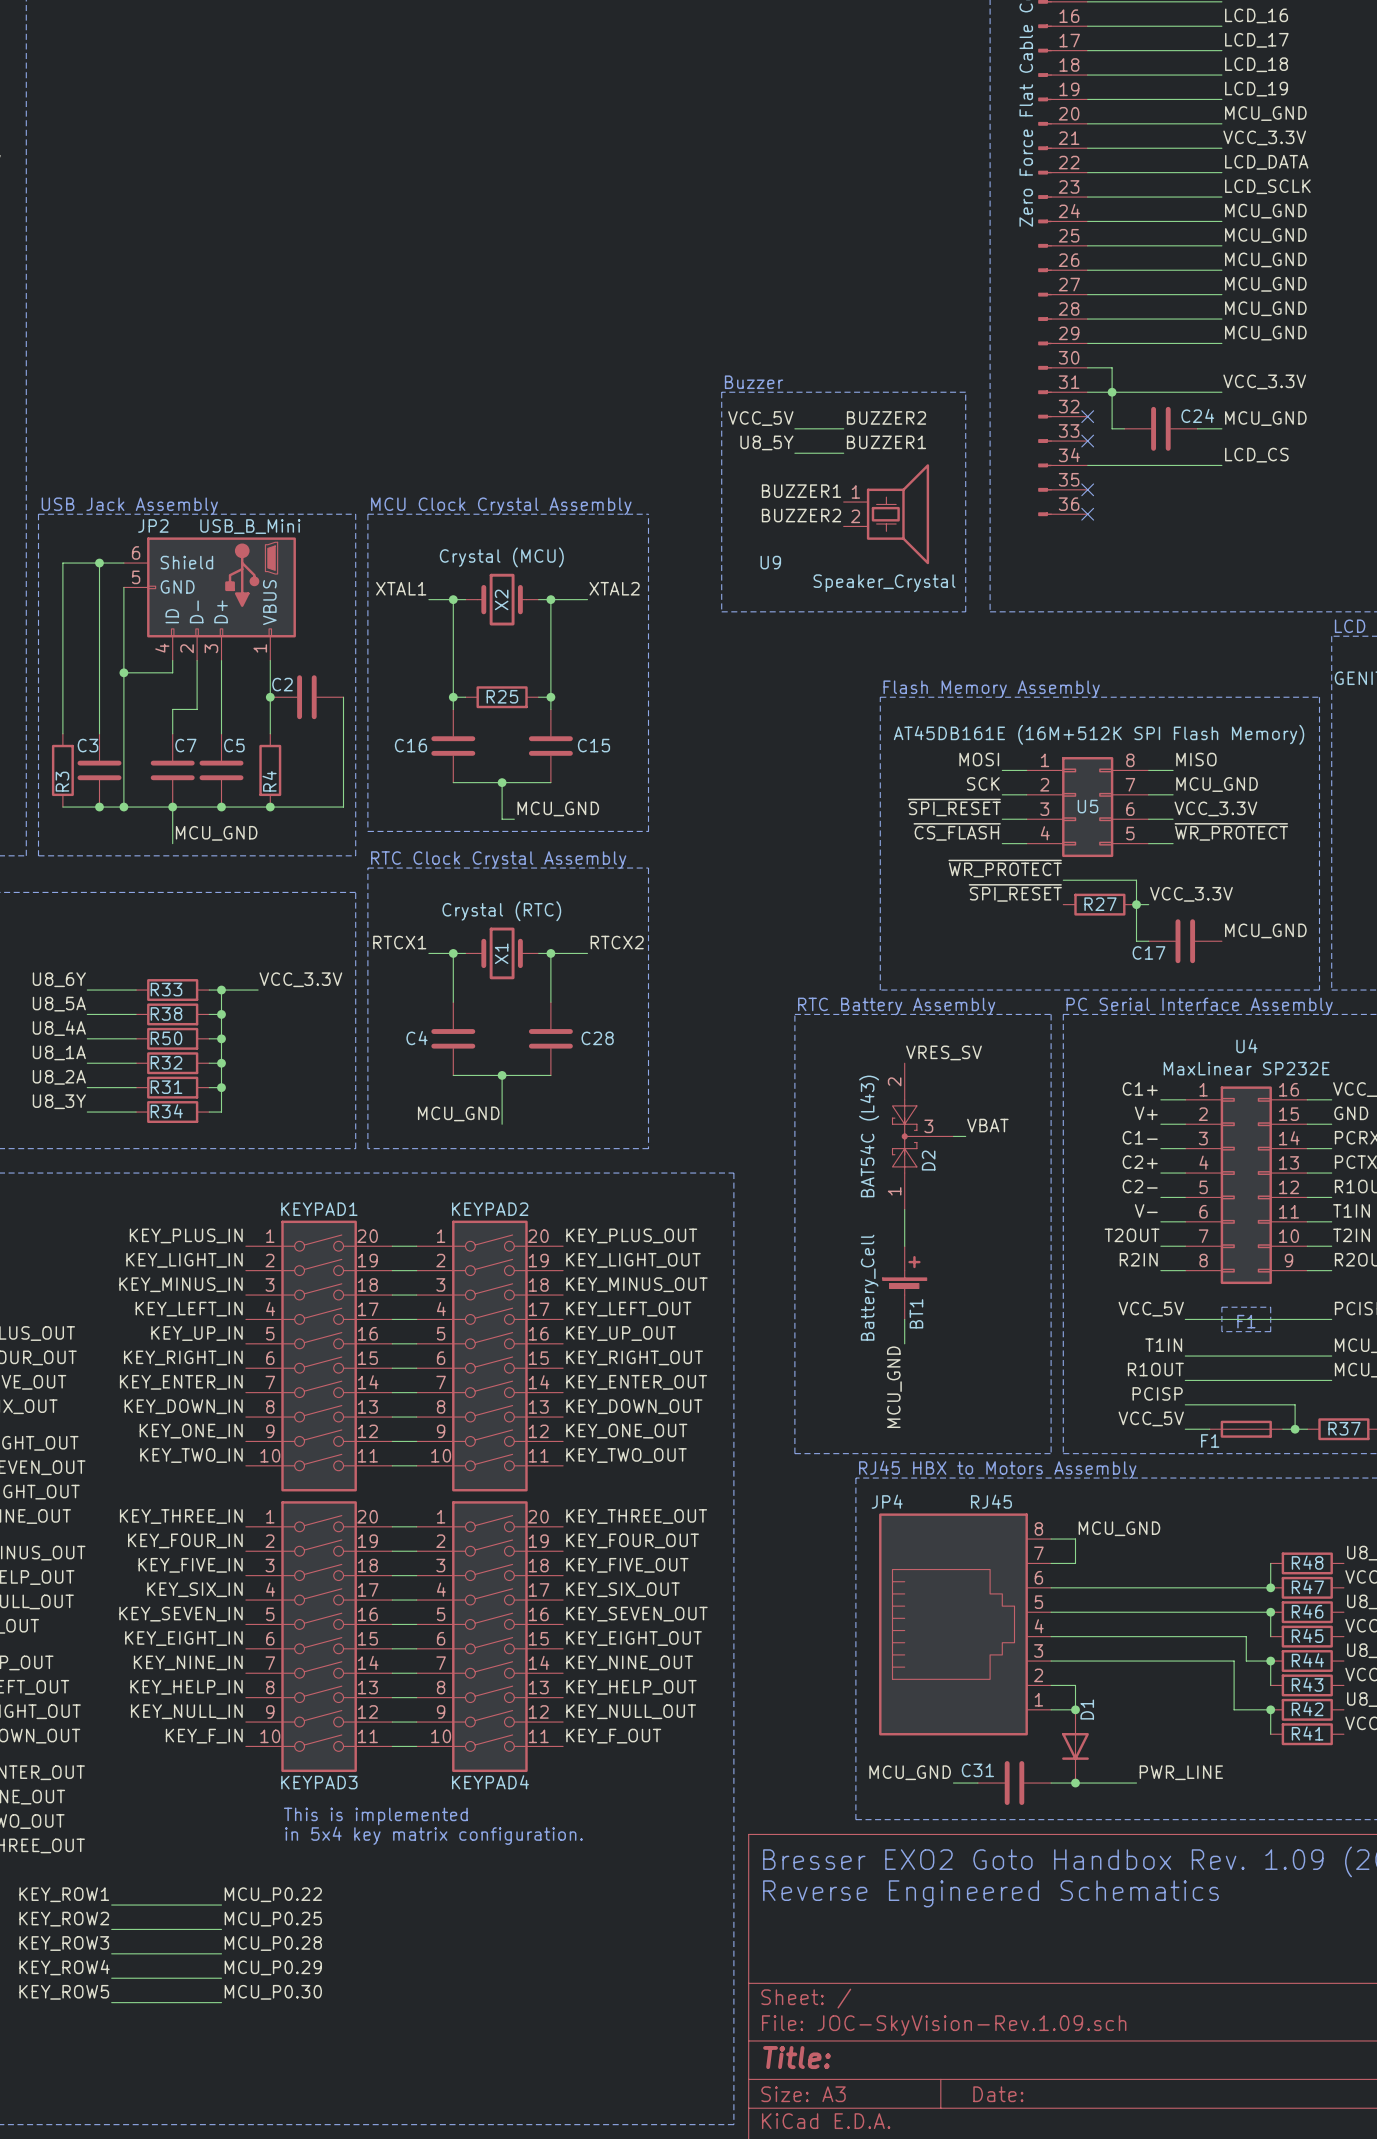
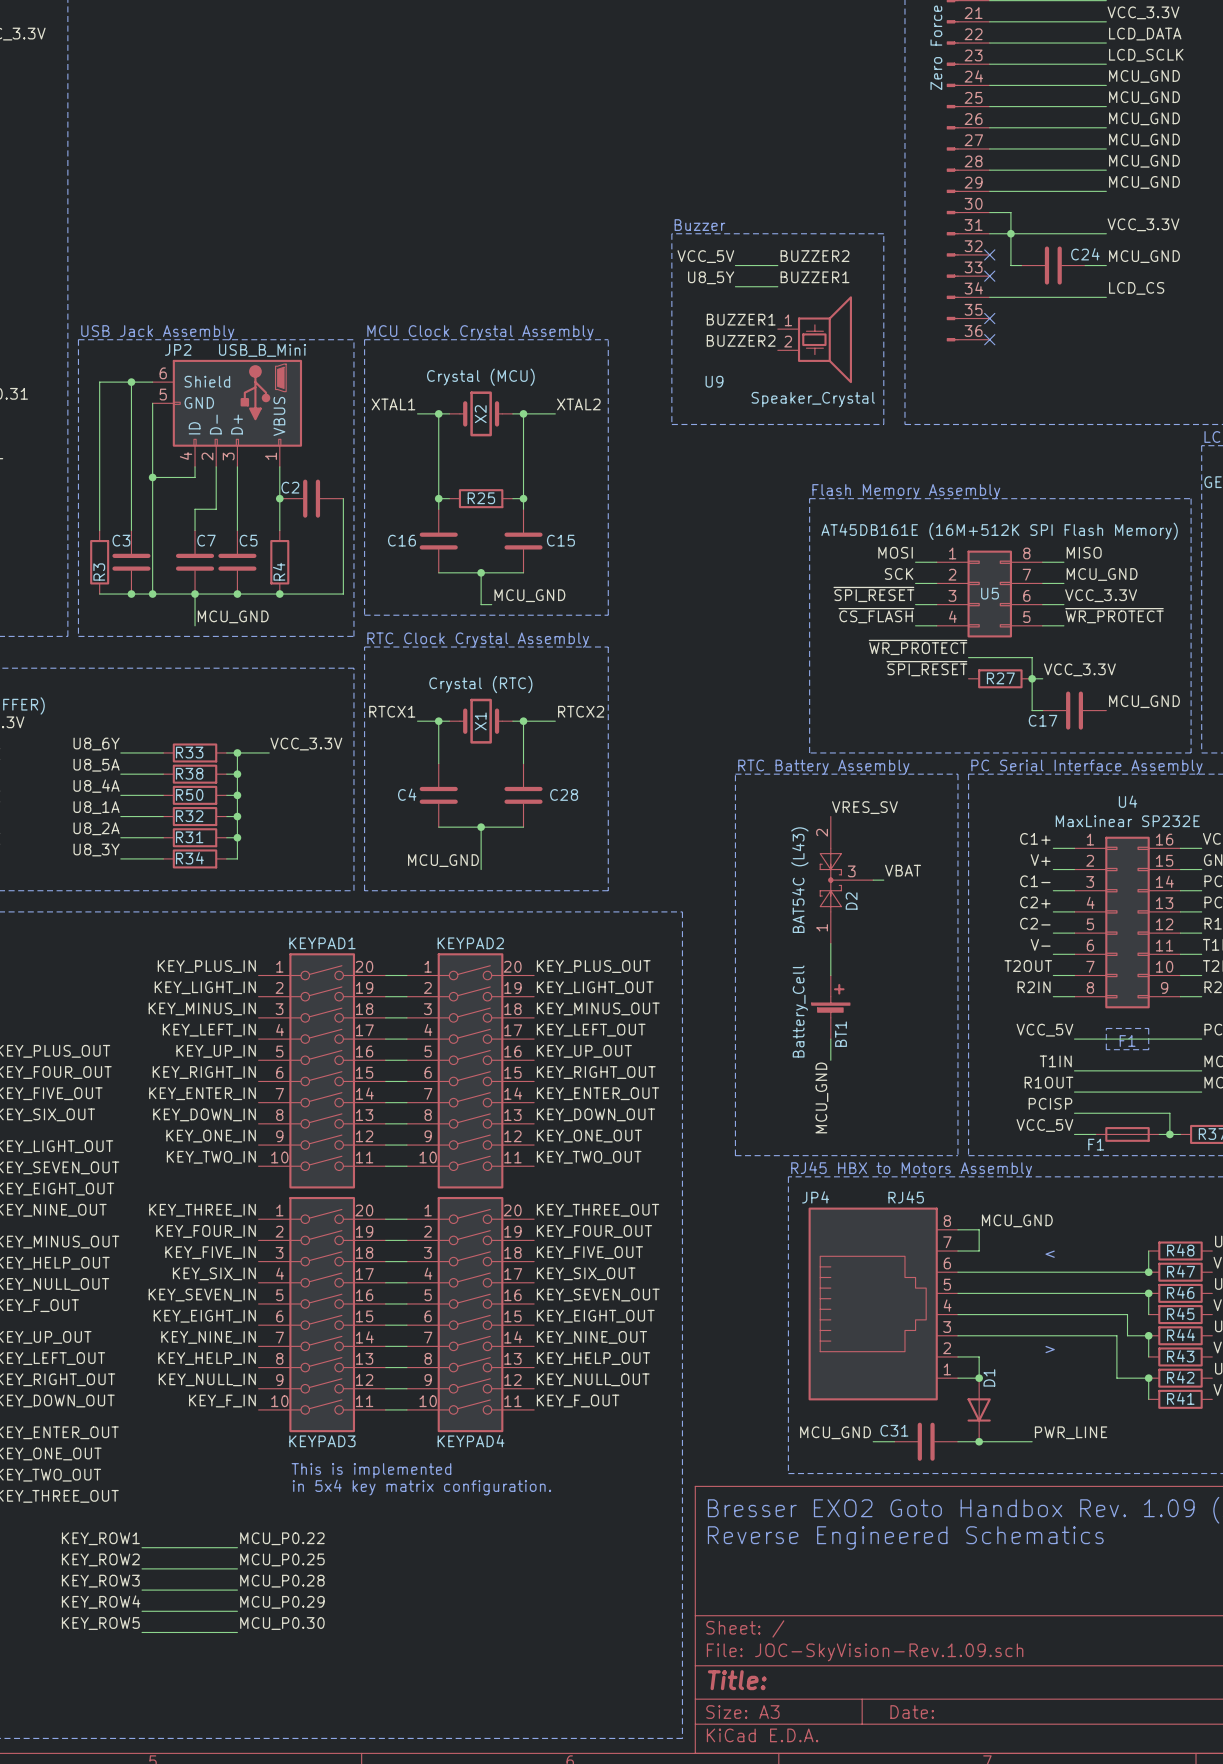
text: none -> < (1050, 1254)
text: none -> > (1050, 1349)

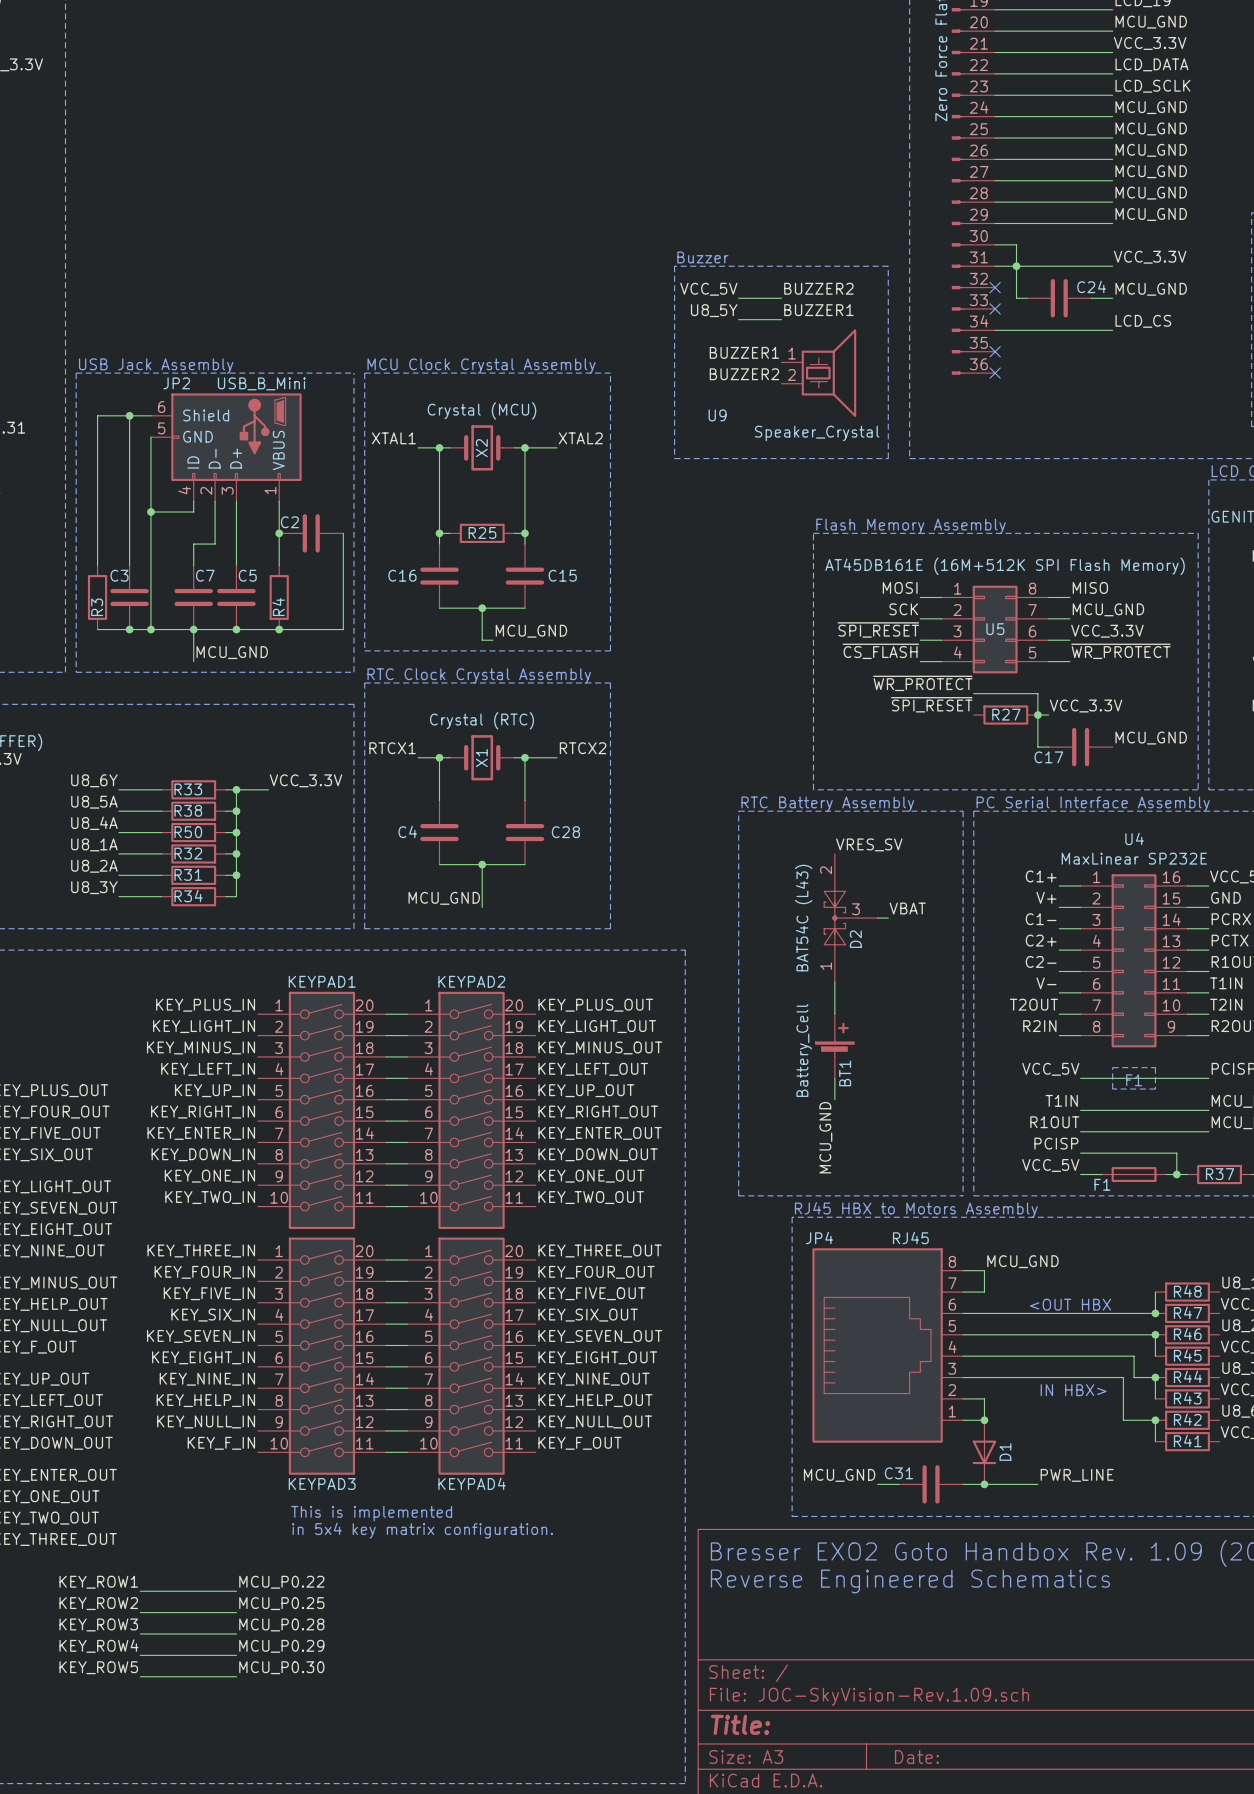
text: < (1050, 1254) -> none
text: none -> <OUT HBX (1070, 1304)
text: none -> IN HBX> (1073, 1390)
text: > (1050, 1349) -> none
D1 name position: D1 (989, 1377) -> D1 (1005, 1452)

